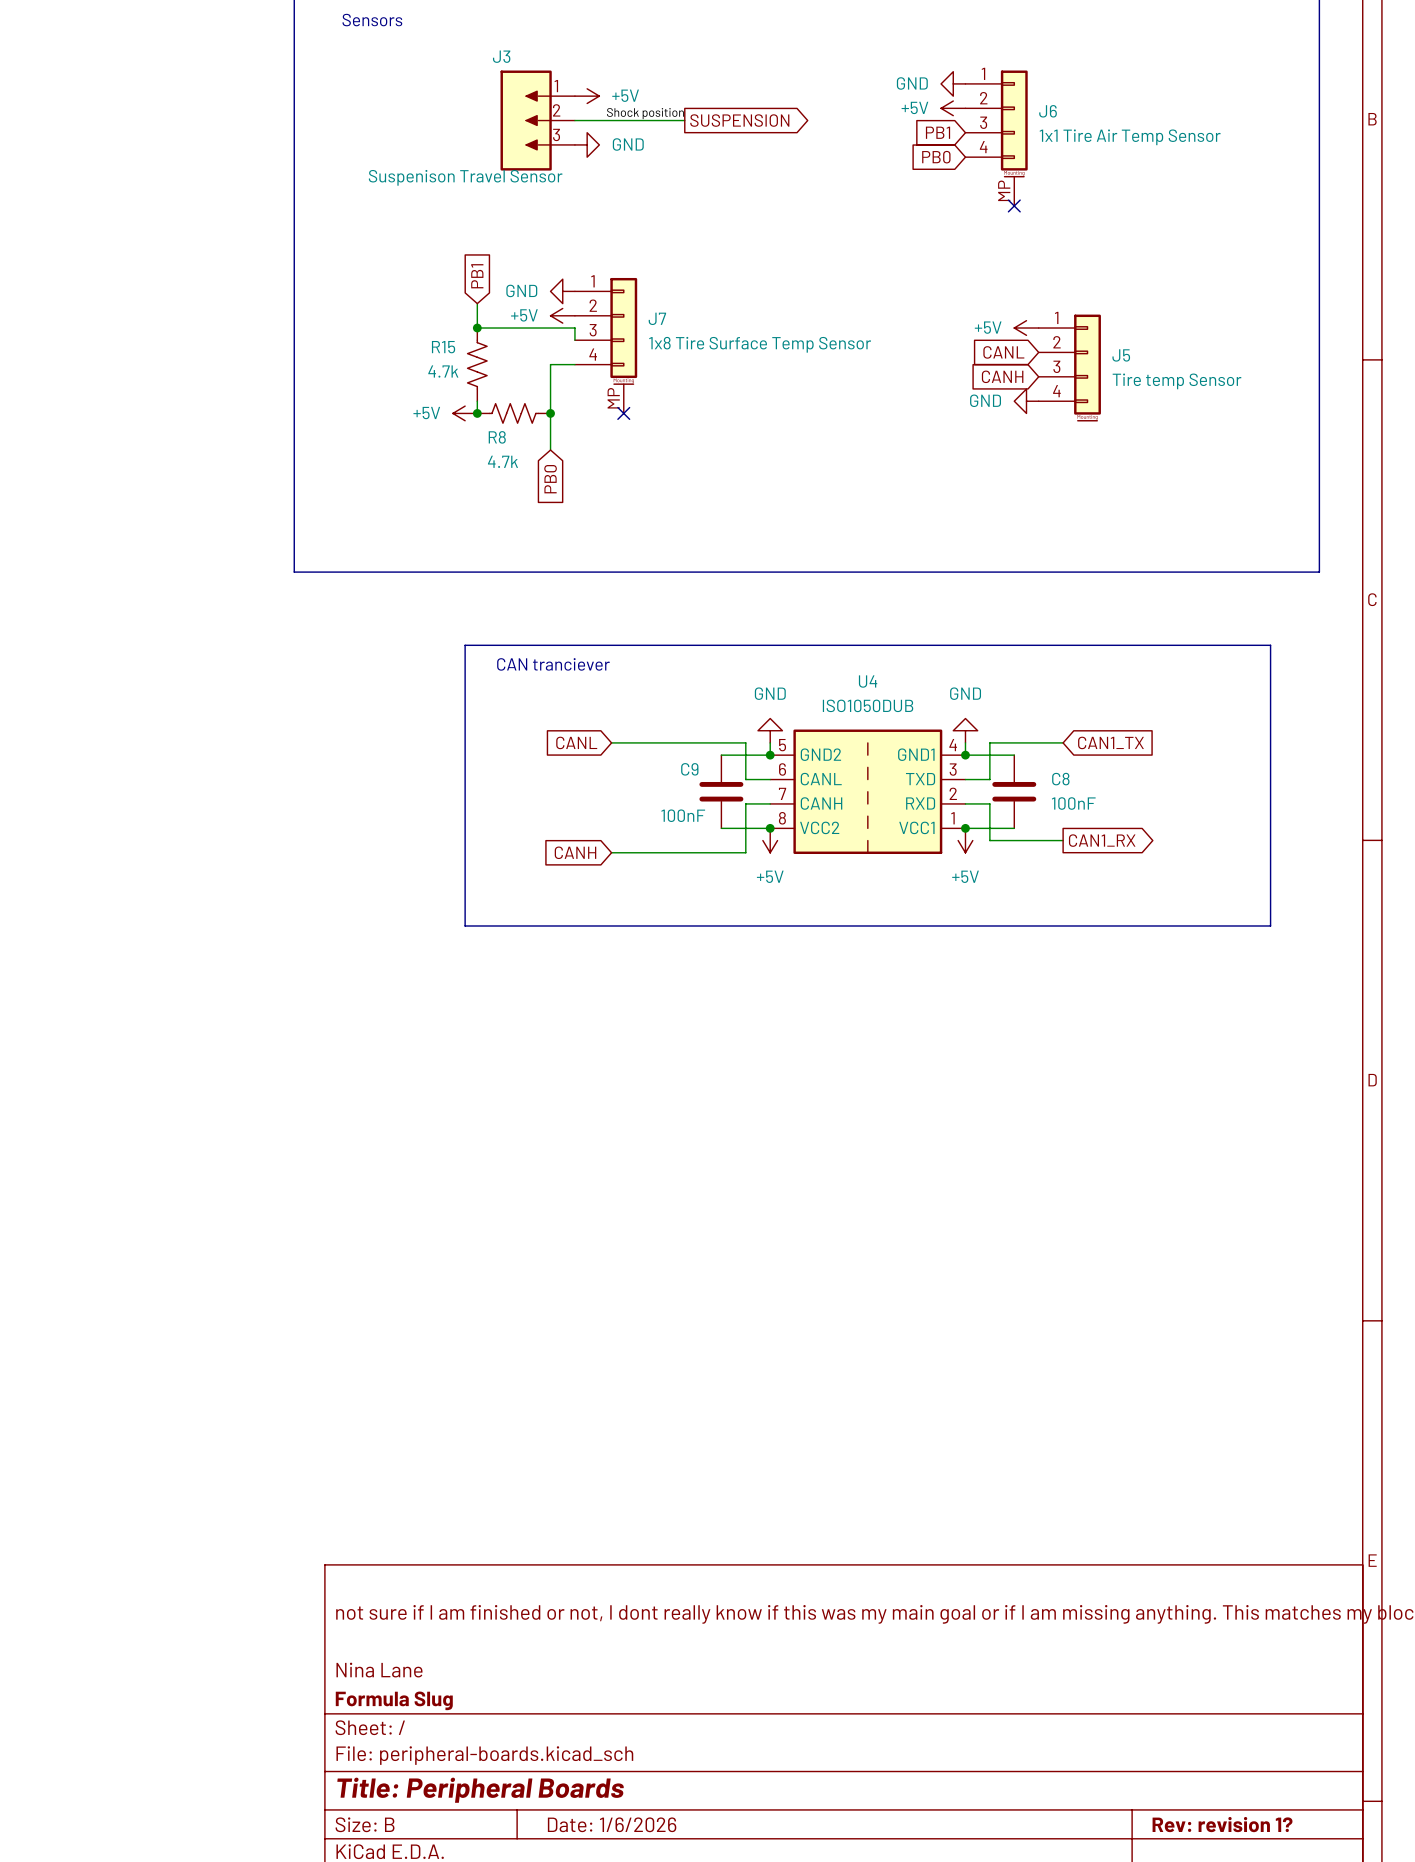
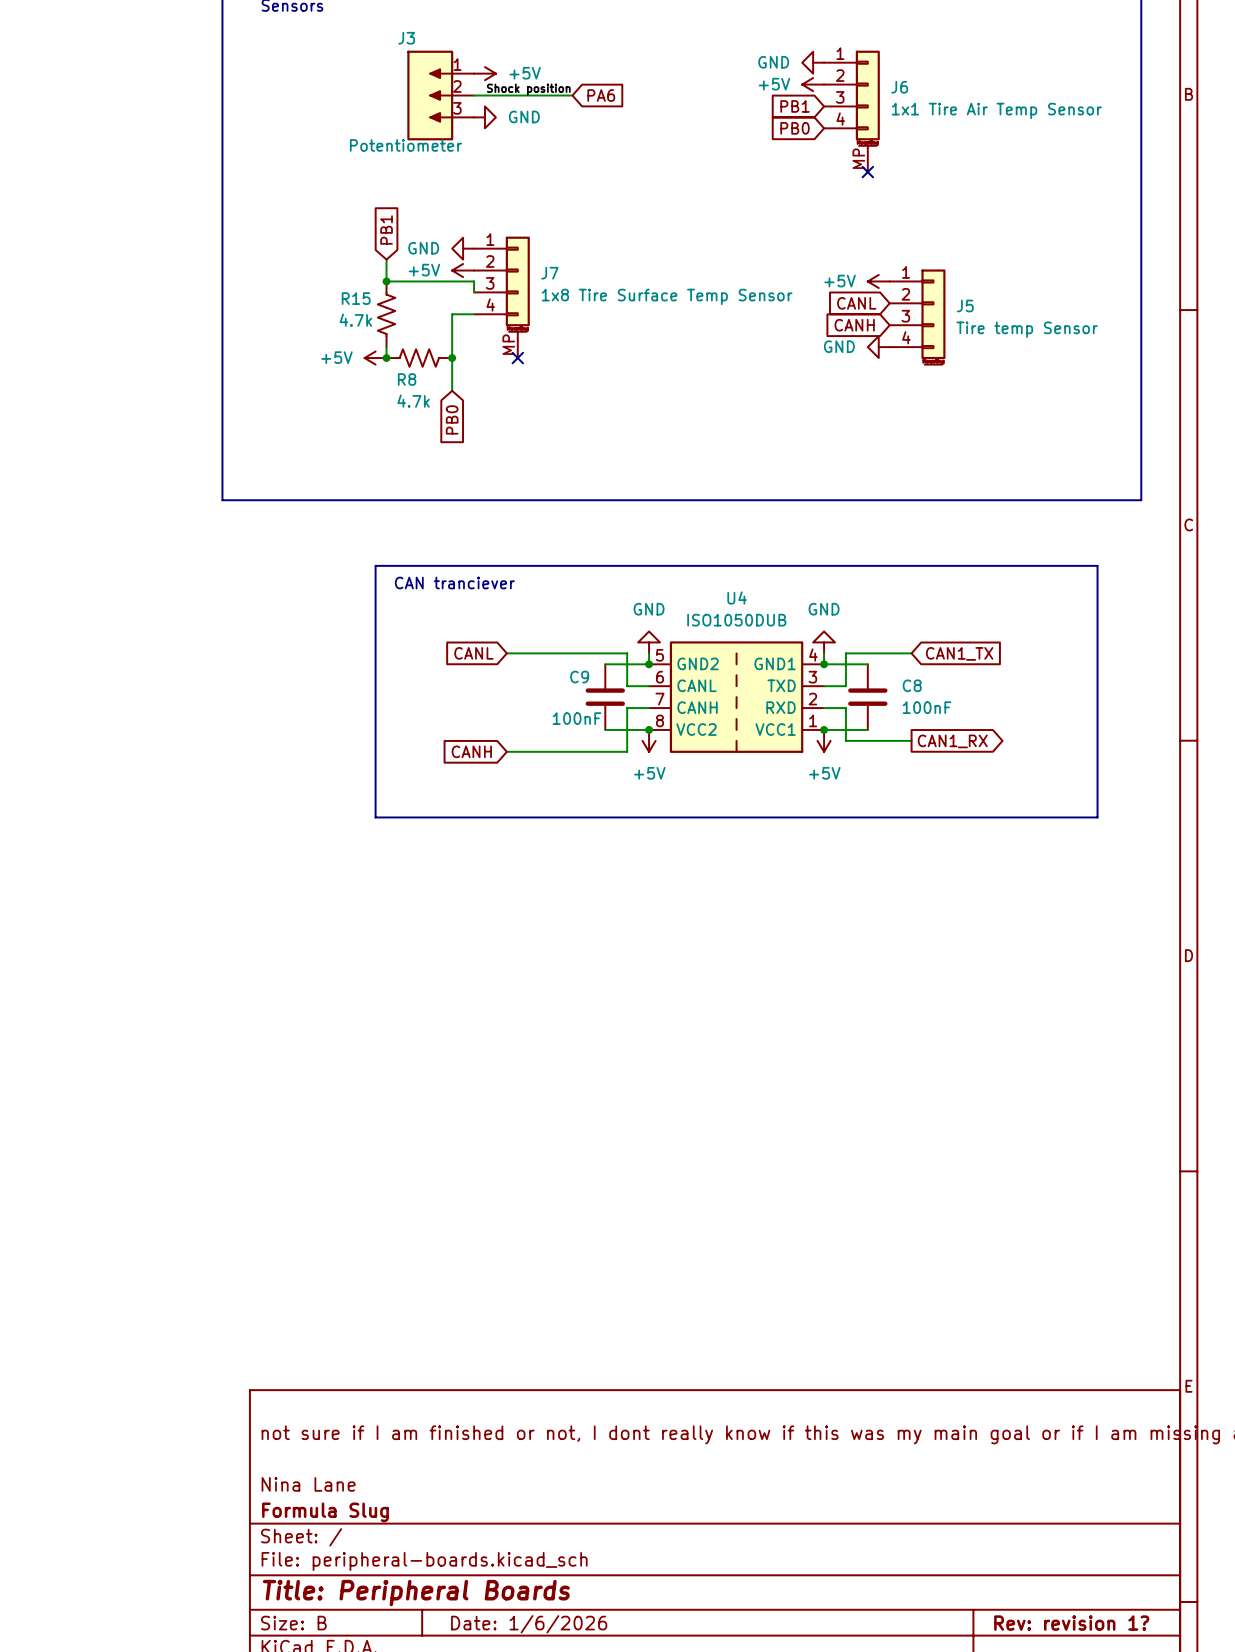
global label shape: output (739, 120) -> input (601, 95)
global label: SUSPENSION (739, 120) -> PA6 (601, 95)
J3 value: Suspenison Travel Sensor (465, 177) -> Potentiometer (405, 145)

